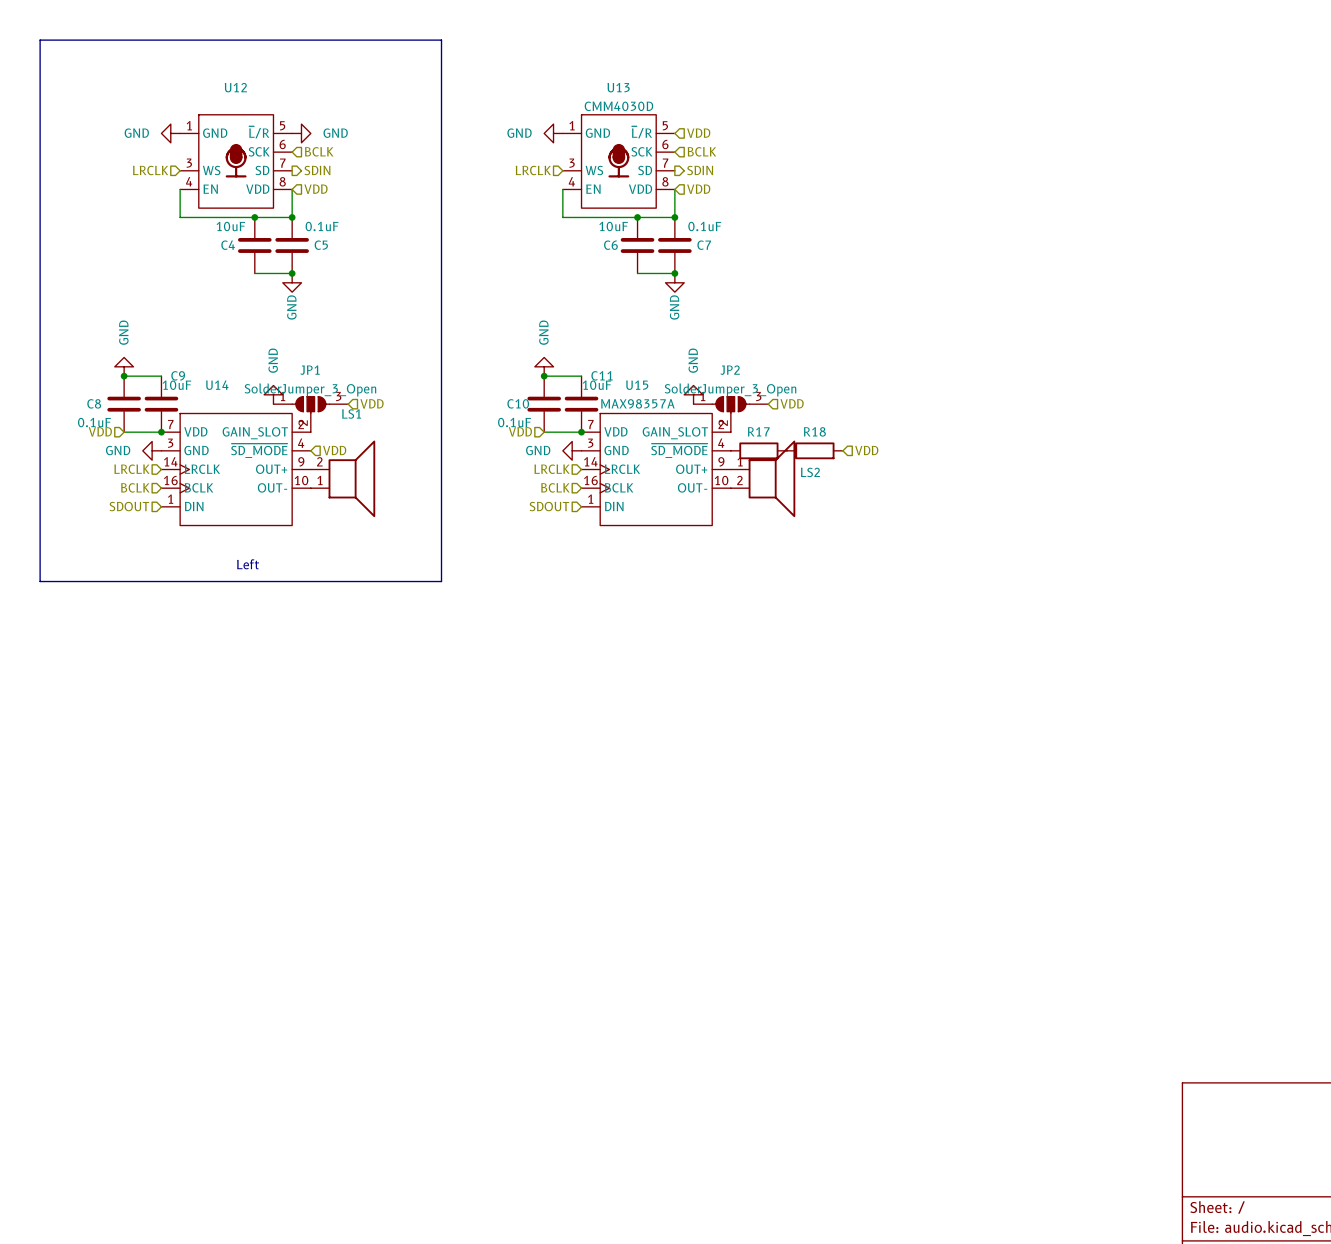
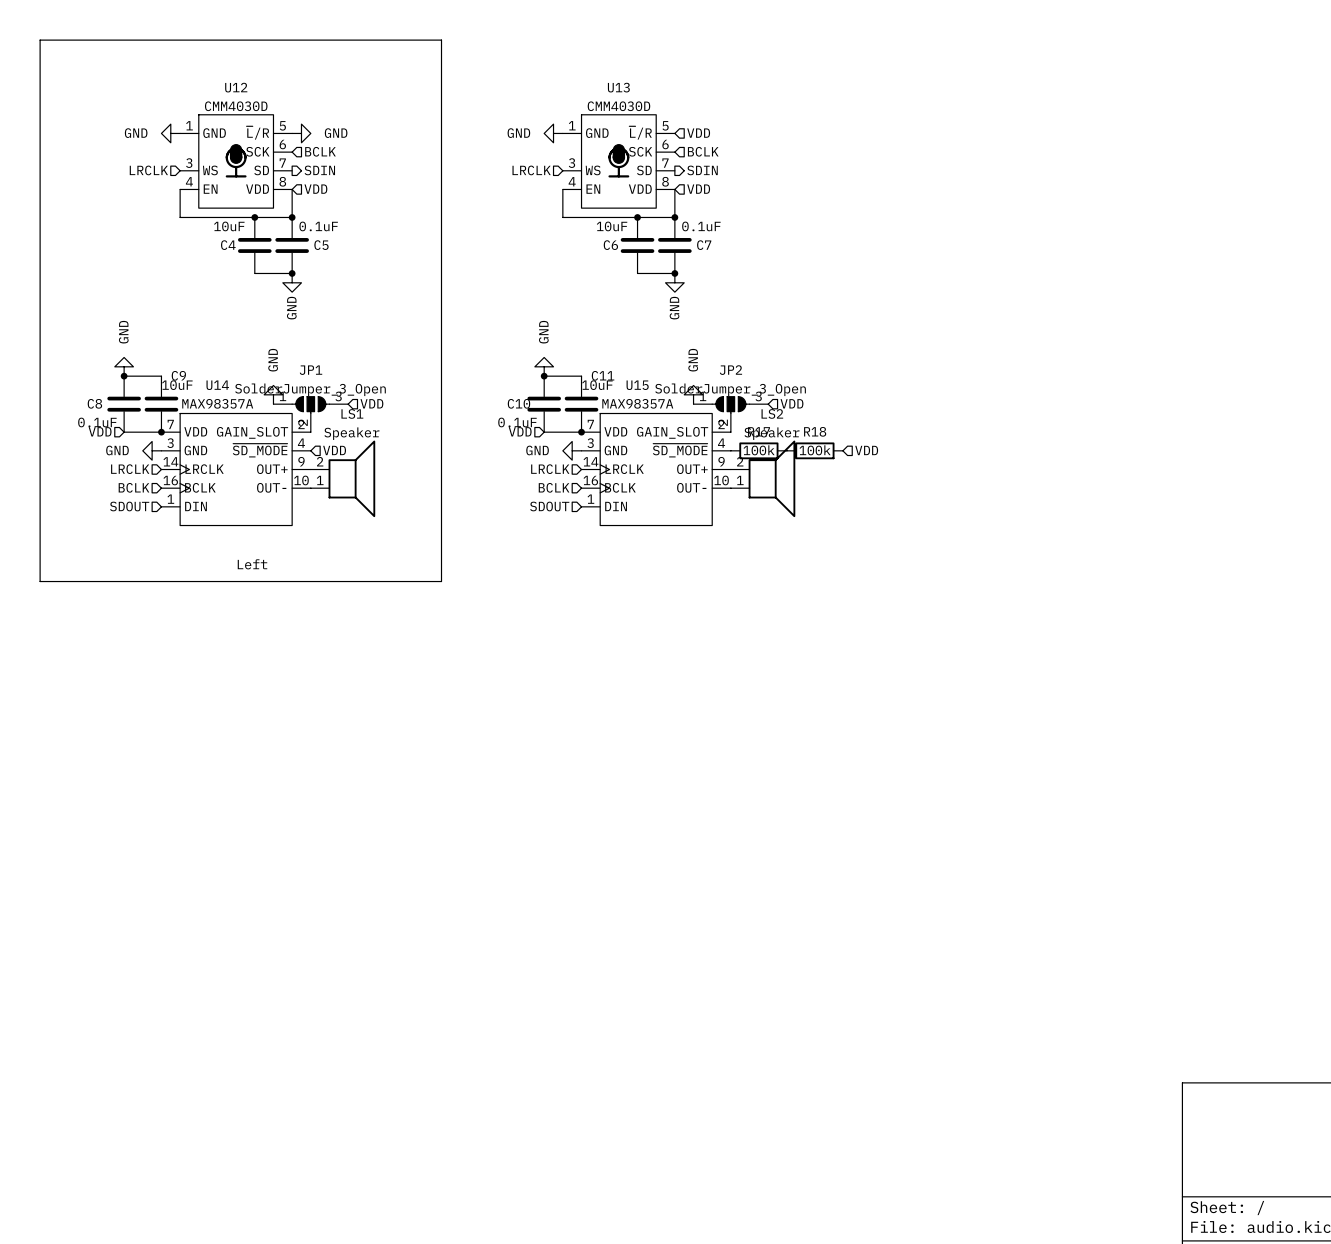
U12 value: none -> CMM4030D (236, 106)
U14 value: none -> MAX98357A (217, 403)
LS1 value: none -> Speaker (351, 433)
LS2 value: none -> Speaker (771, 433)
R17 value: none -> 100k (759, 450)
R18 value: none -> 100k (815, 450)
LS2 name position: LS2 (810, 472) -> LS2 (772, 413)
LS2 flip: as is (771, 478) -> up-down (771, 478)

